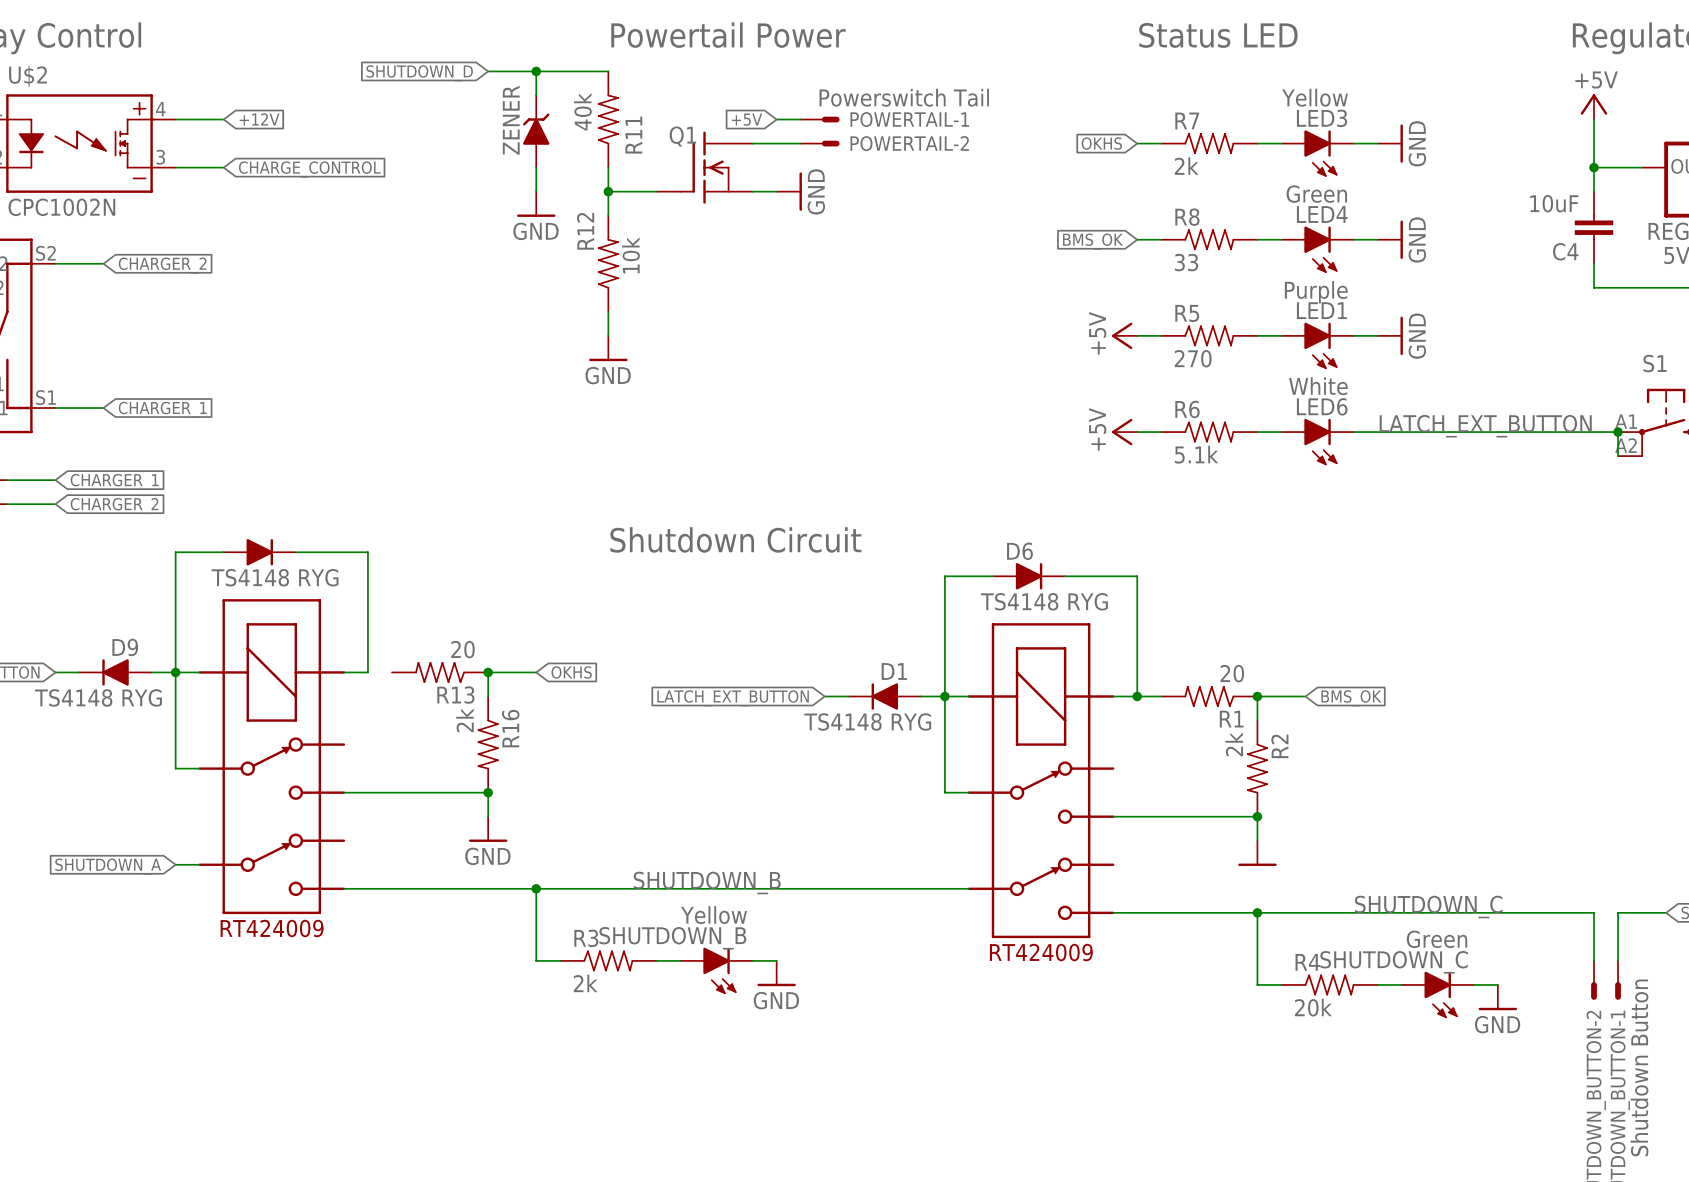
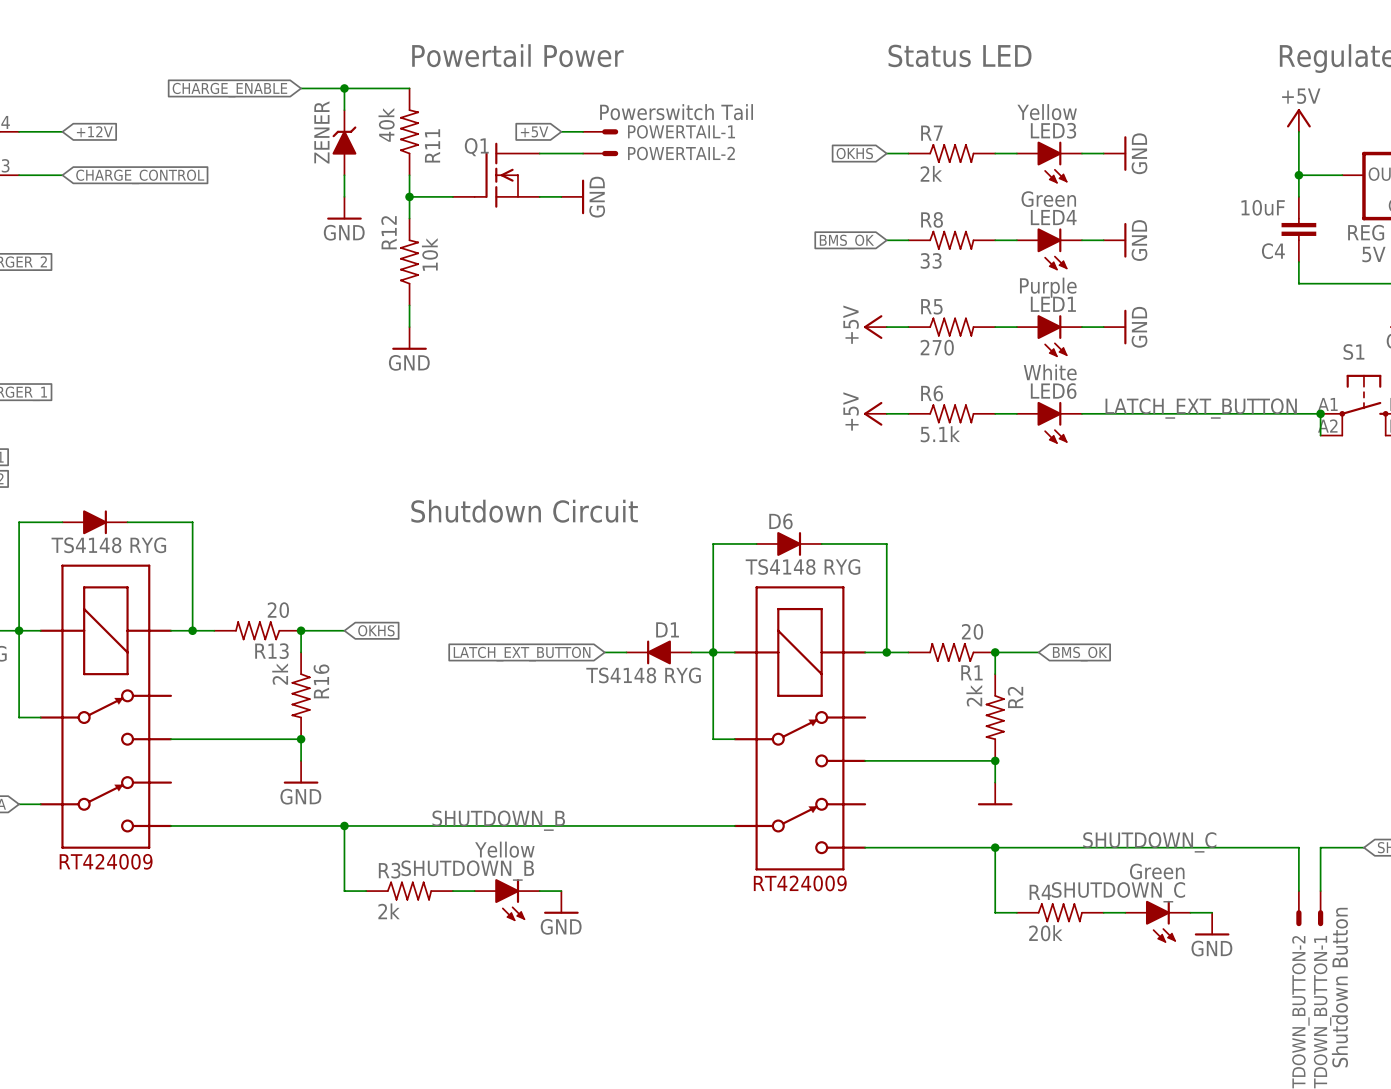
global label: SHUTDOWN_D (419, 73) -> CHARGE_ENABLE (229, 90)
wire: none -> (192, 630) (214, 630)
junction: none -> (192, 630)

